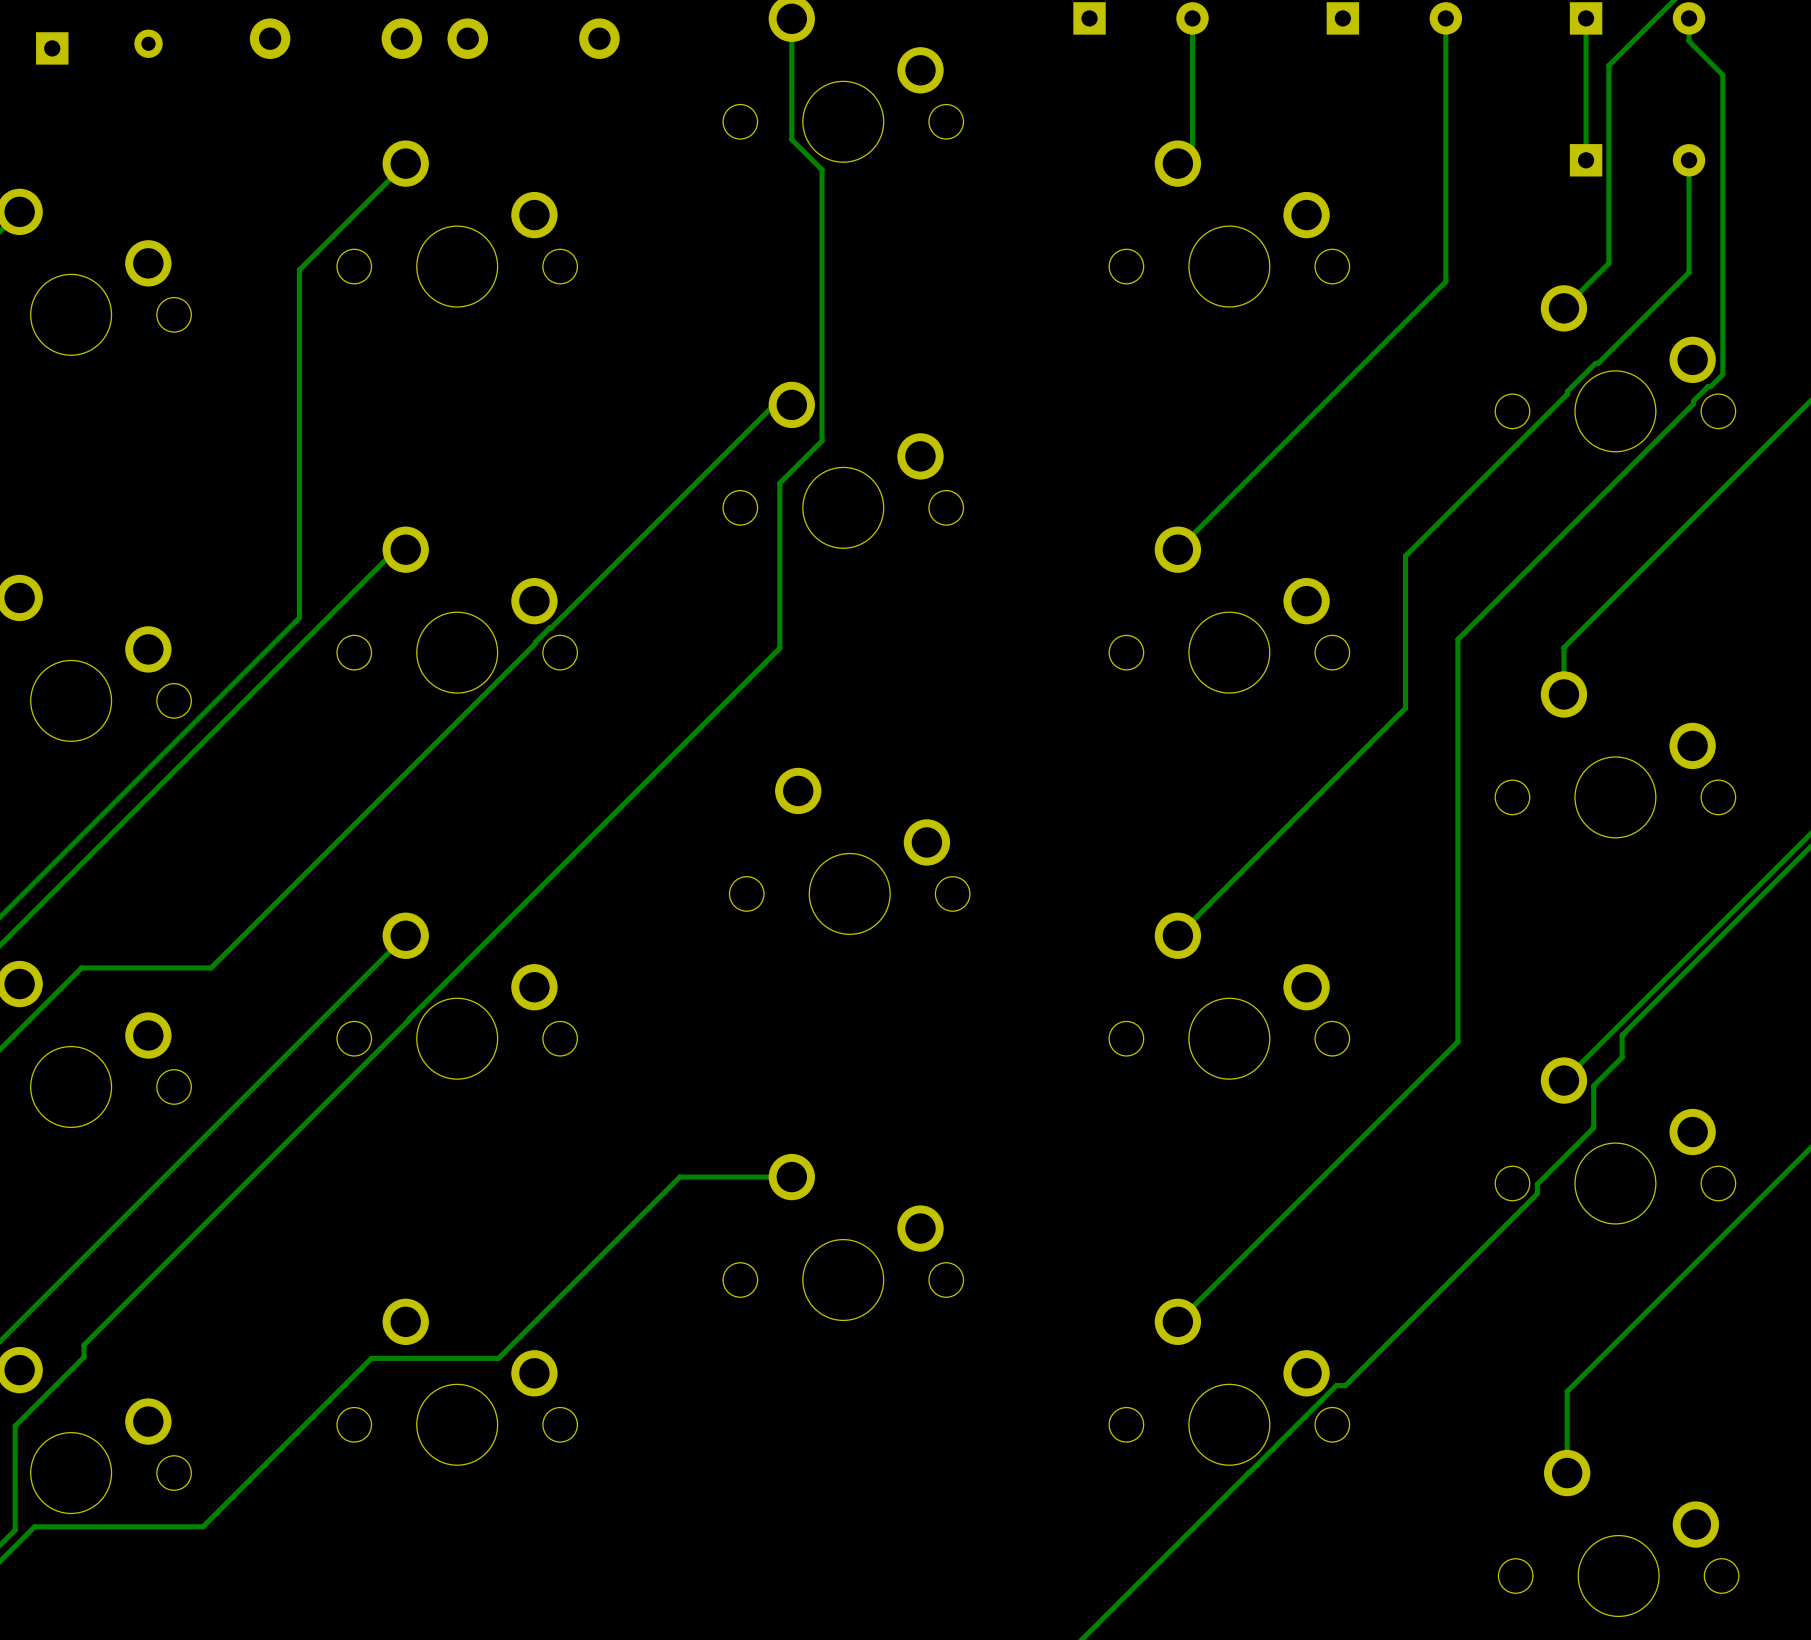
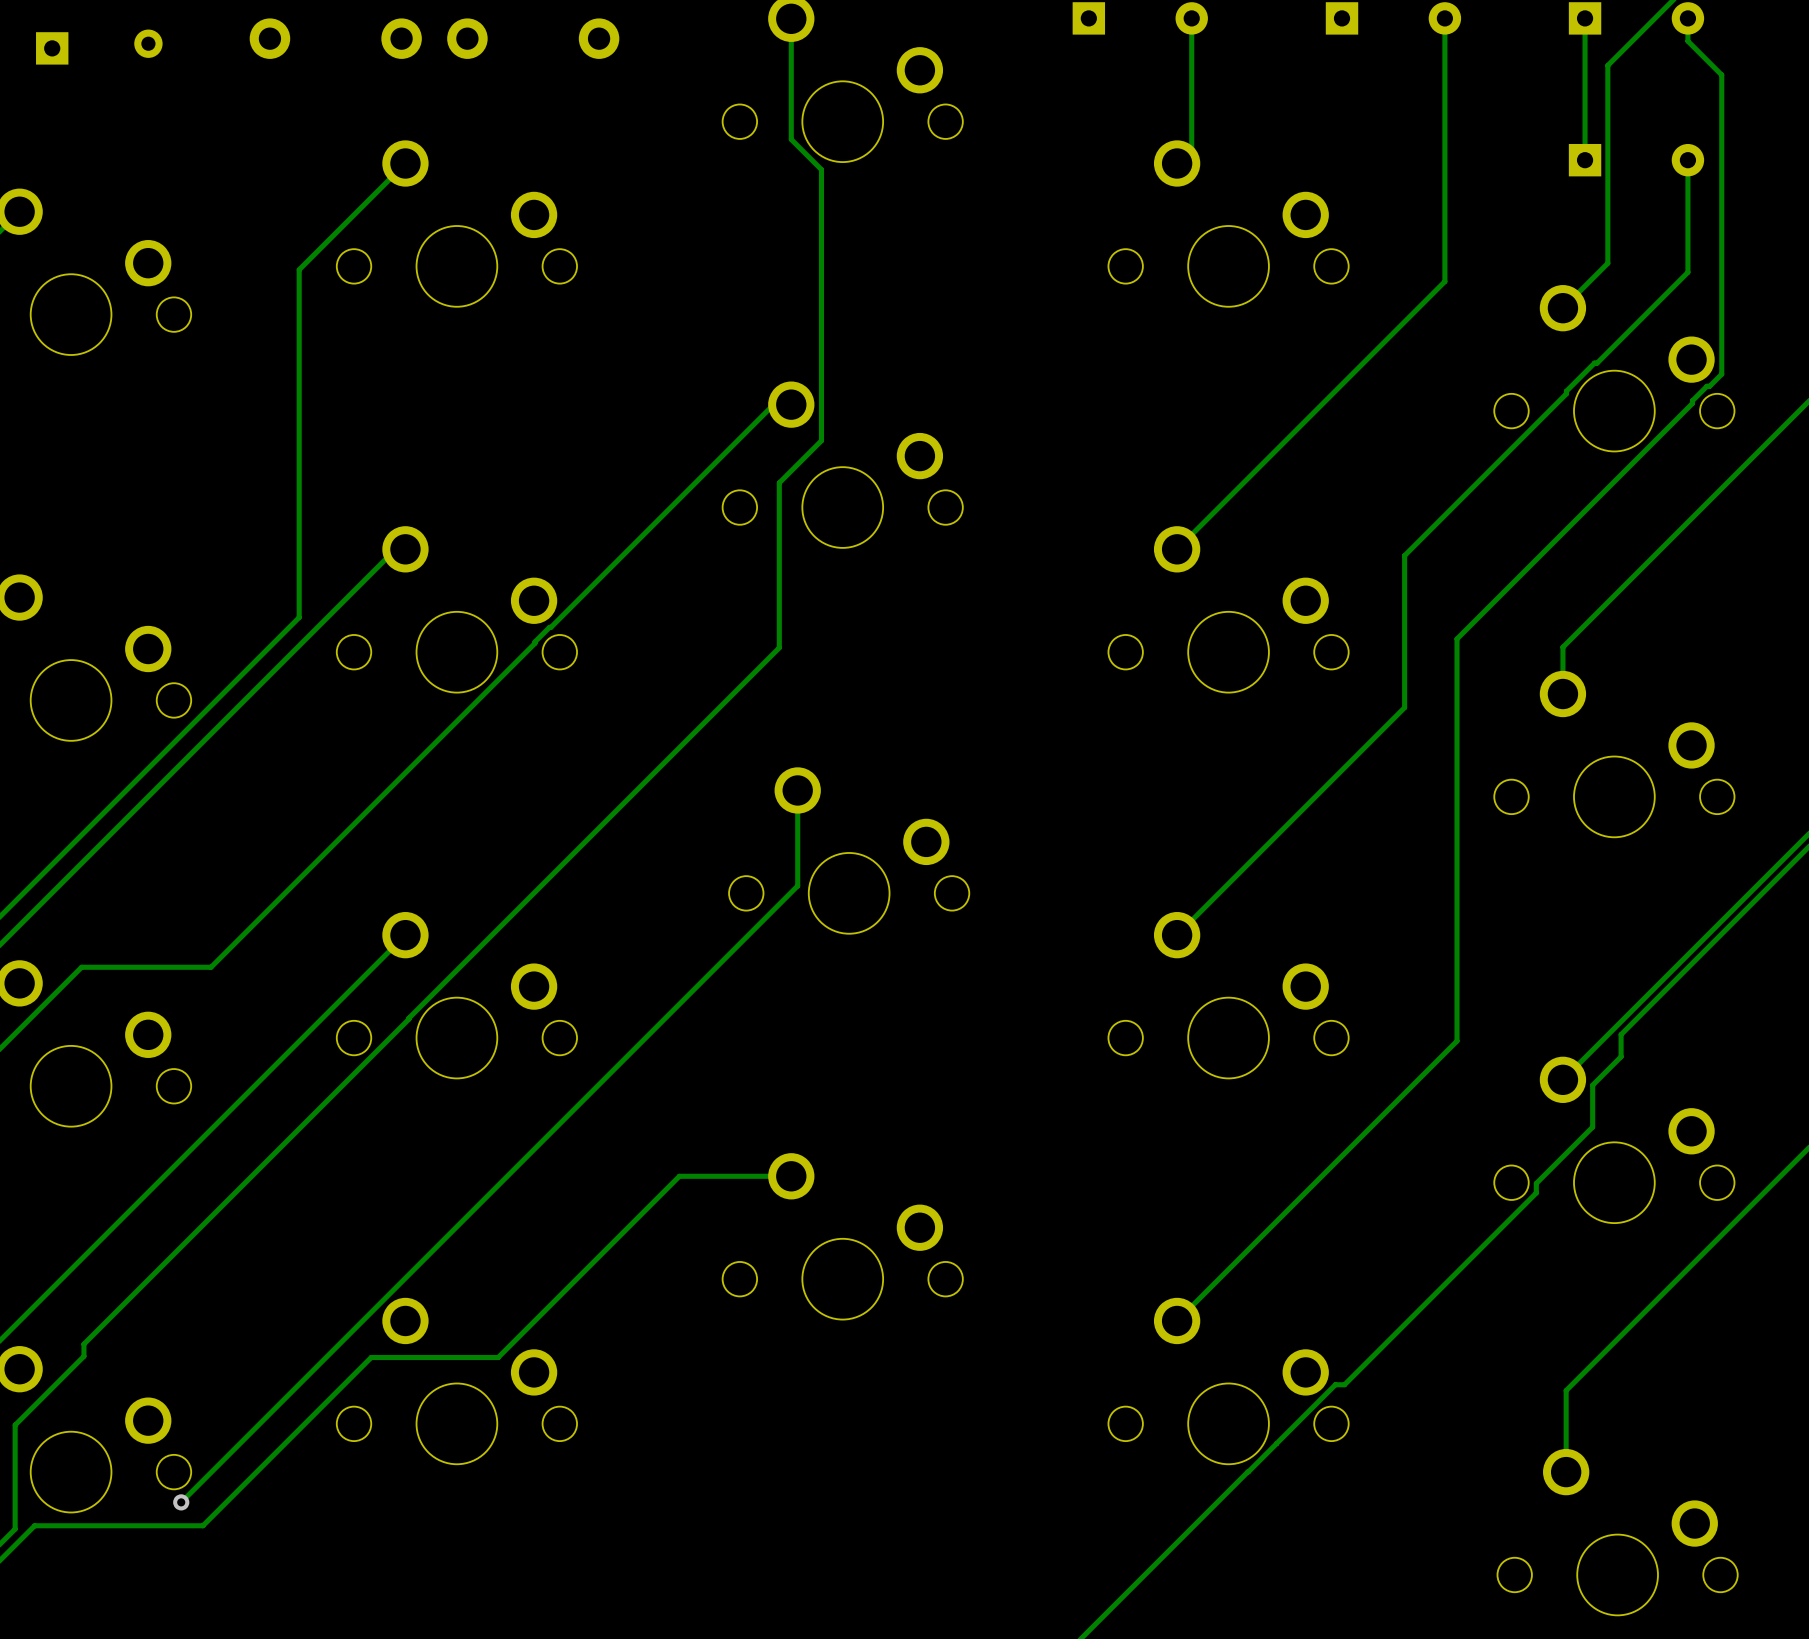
track: none -> (797, 790) (797, 885) (181, 1502)
via: none -> (181, 1502)

